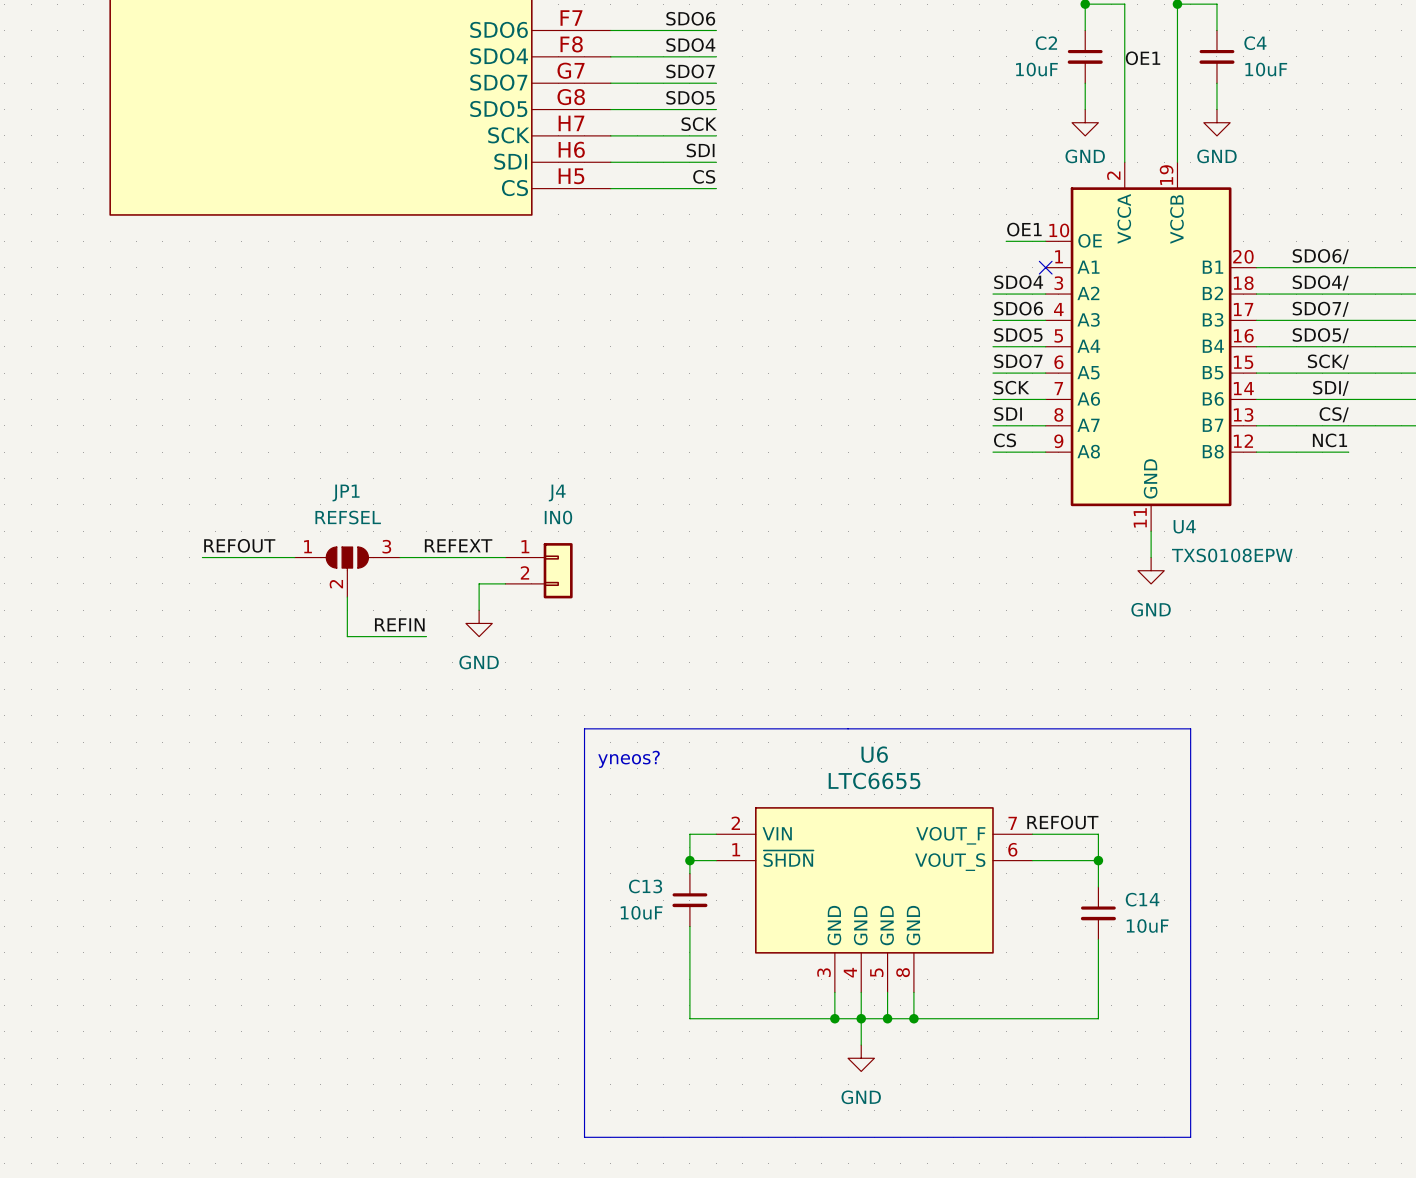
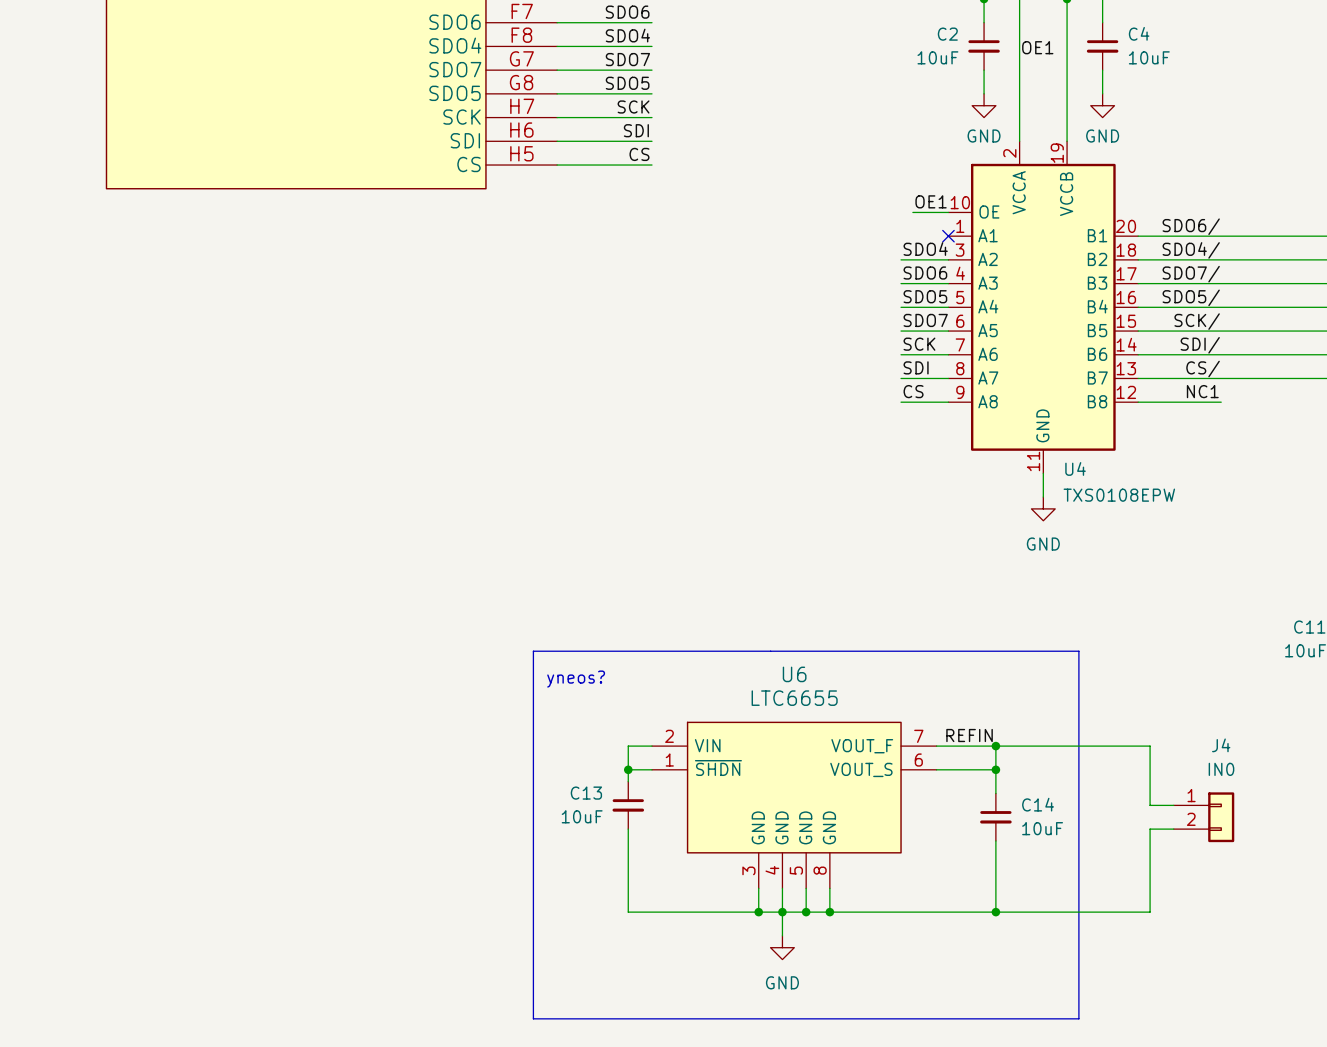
label: REFOUT (239, 545) -> none
label: REFEXT (458, 545) -> none
wire: (202, 557) (294, 557) -> none
wire: (400, 557) (505, 557) -> none
J4 position: (539, 570) -> (1204, 817)
JP1: REFSEL (347, 572) -> none
wire: (505, 583) (479, 583) (479, 610) -> none
wire: (347, 597) (347, 636) (426, 636) -> none
power symbol: GND (479, 623) -> none
label: REFIN (399, 624) -> none
label: REFOUT (1062, 822) -> REFIN (969, 735)
wire: none -> (995, 746) (1150, 746) (1150, 805) (1173, 805)
junction: none -> (995, 746)
wire: none -> (1173, 829) (1150, 829) (1150, 912) (995, 912)
junction: none -> (995, 912)

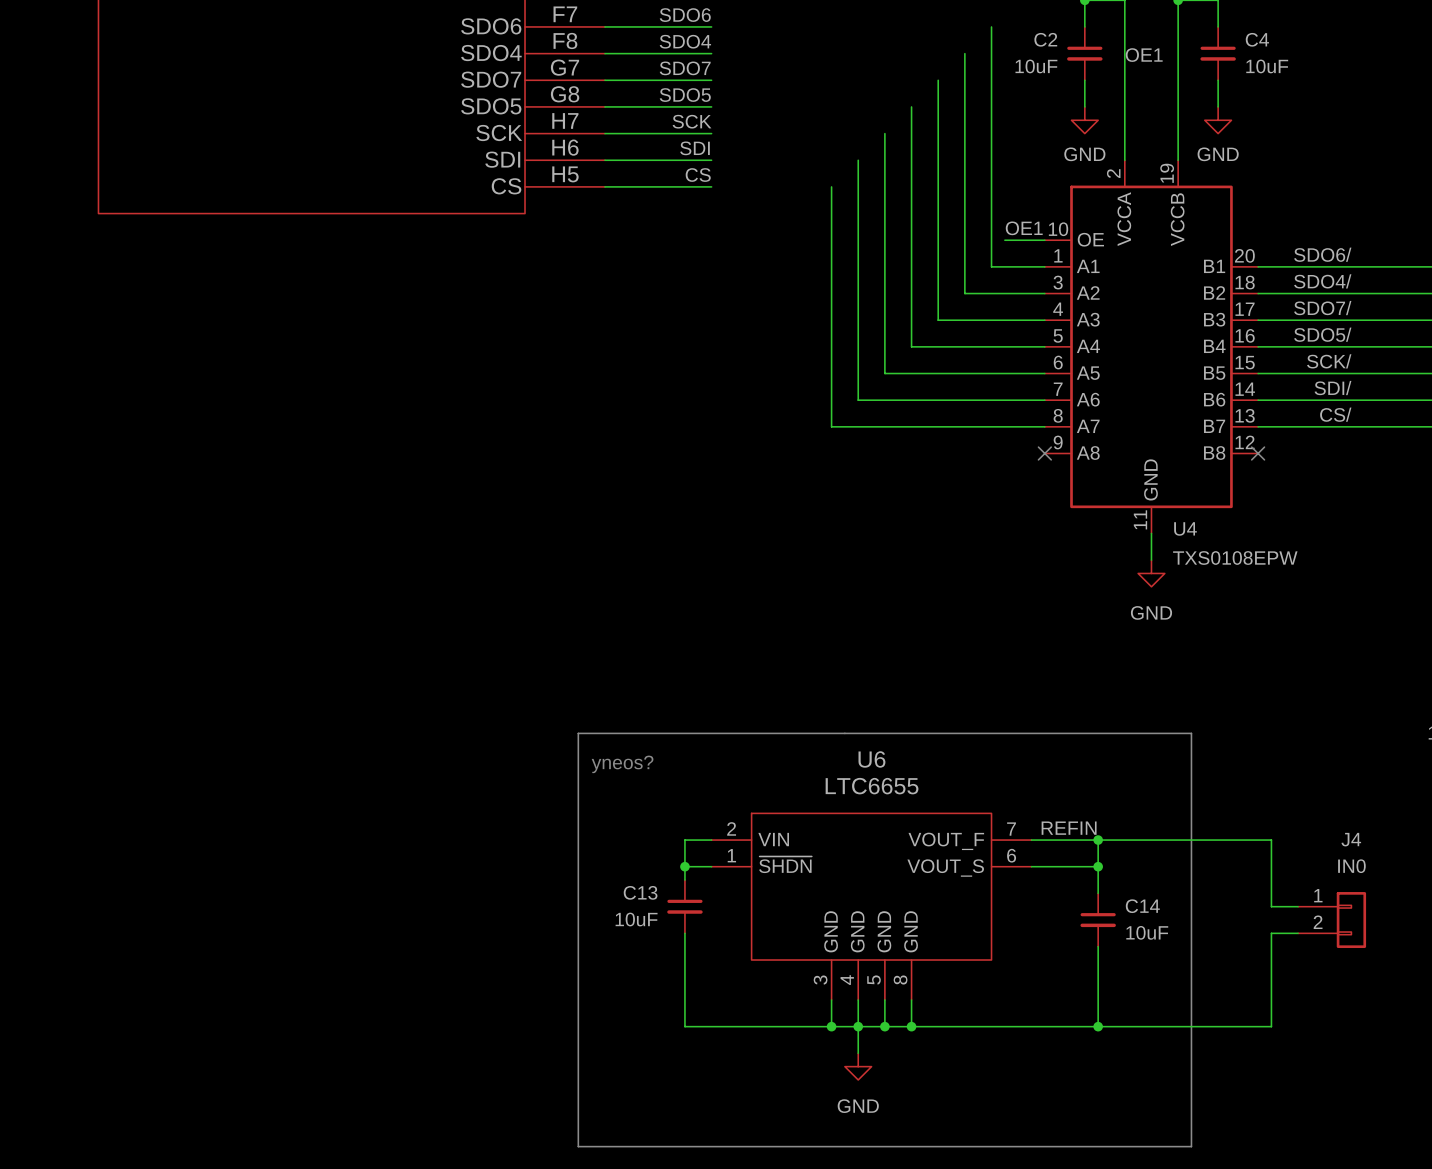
wire: none -> (991, 26) (991, 266) (1044, 266)
wire: none -> (964, 53) (964, 293) (991, 293)
wire: none -> (938, 80) (938, 320) (991, 320)
wire: none -> (911, 106) (911, 346) (991, 346)
wire: none -> (884, 133) (884, 373) (991, 373)
wire: none -> (858, 160) (858, 400) (991, 400)
wire: none -> (831, 186) (831, 426) (991, 426)
no-connect mark: (948, 236) -> none
label: SDO4 (925, 249) -> none
label: SDO6 (925, 273) -> none
label: SDO5 (925, 296) -> none
label: SDO7 (925, 320) -> none
label: SCK (919, 344) -> none
label: SDI (916, 367) -> none
label: CS (913, 391) -> none
label: NC1 (1202, 391) -> none
wire: (901, 402) (948, 402) -> none
no-connect mark: none -> (1044, 453)
wire: (1138, 402) (1221, 402) -> none
no-connect mark: none -> (1258, 453)

